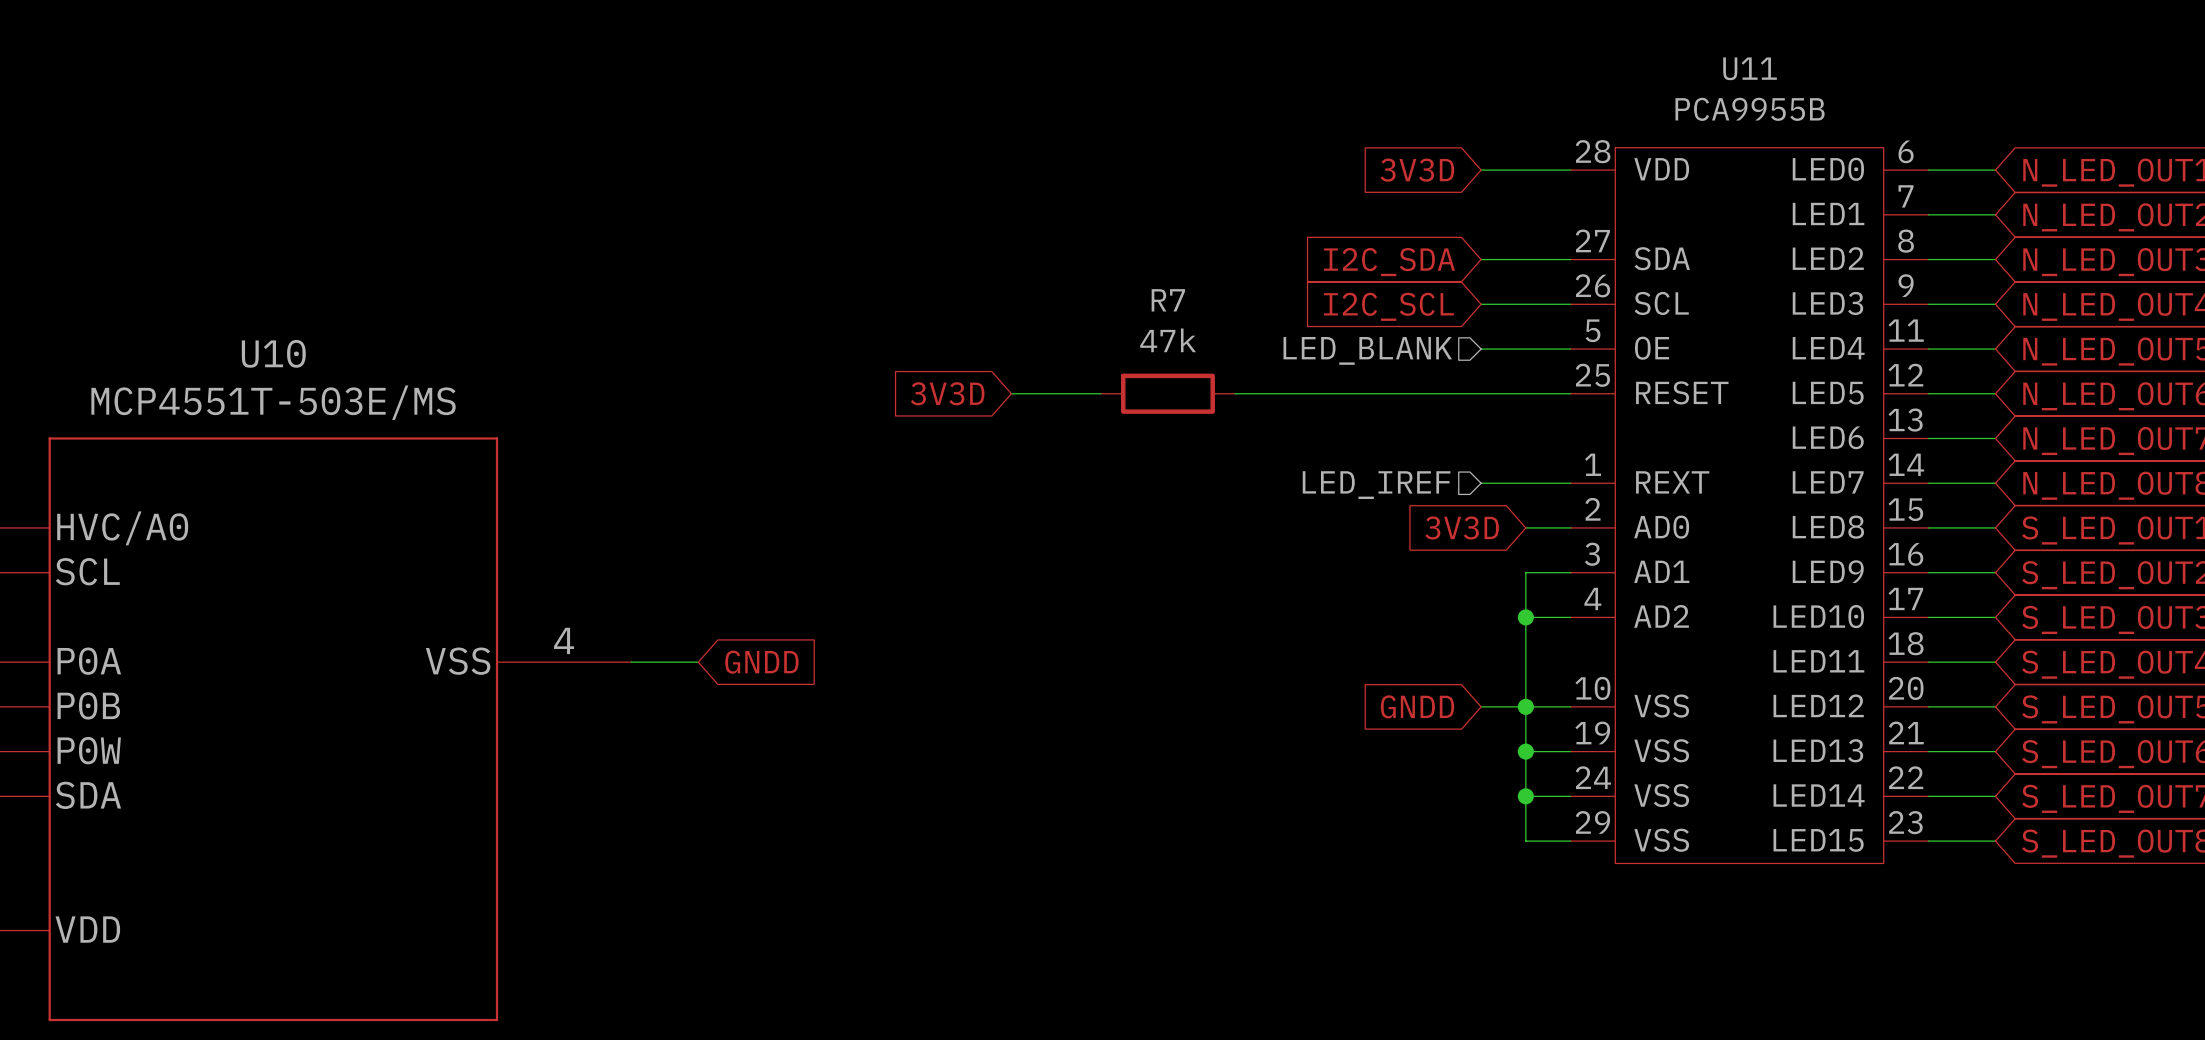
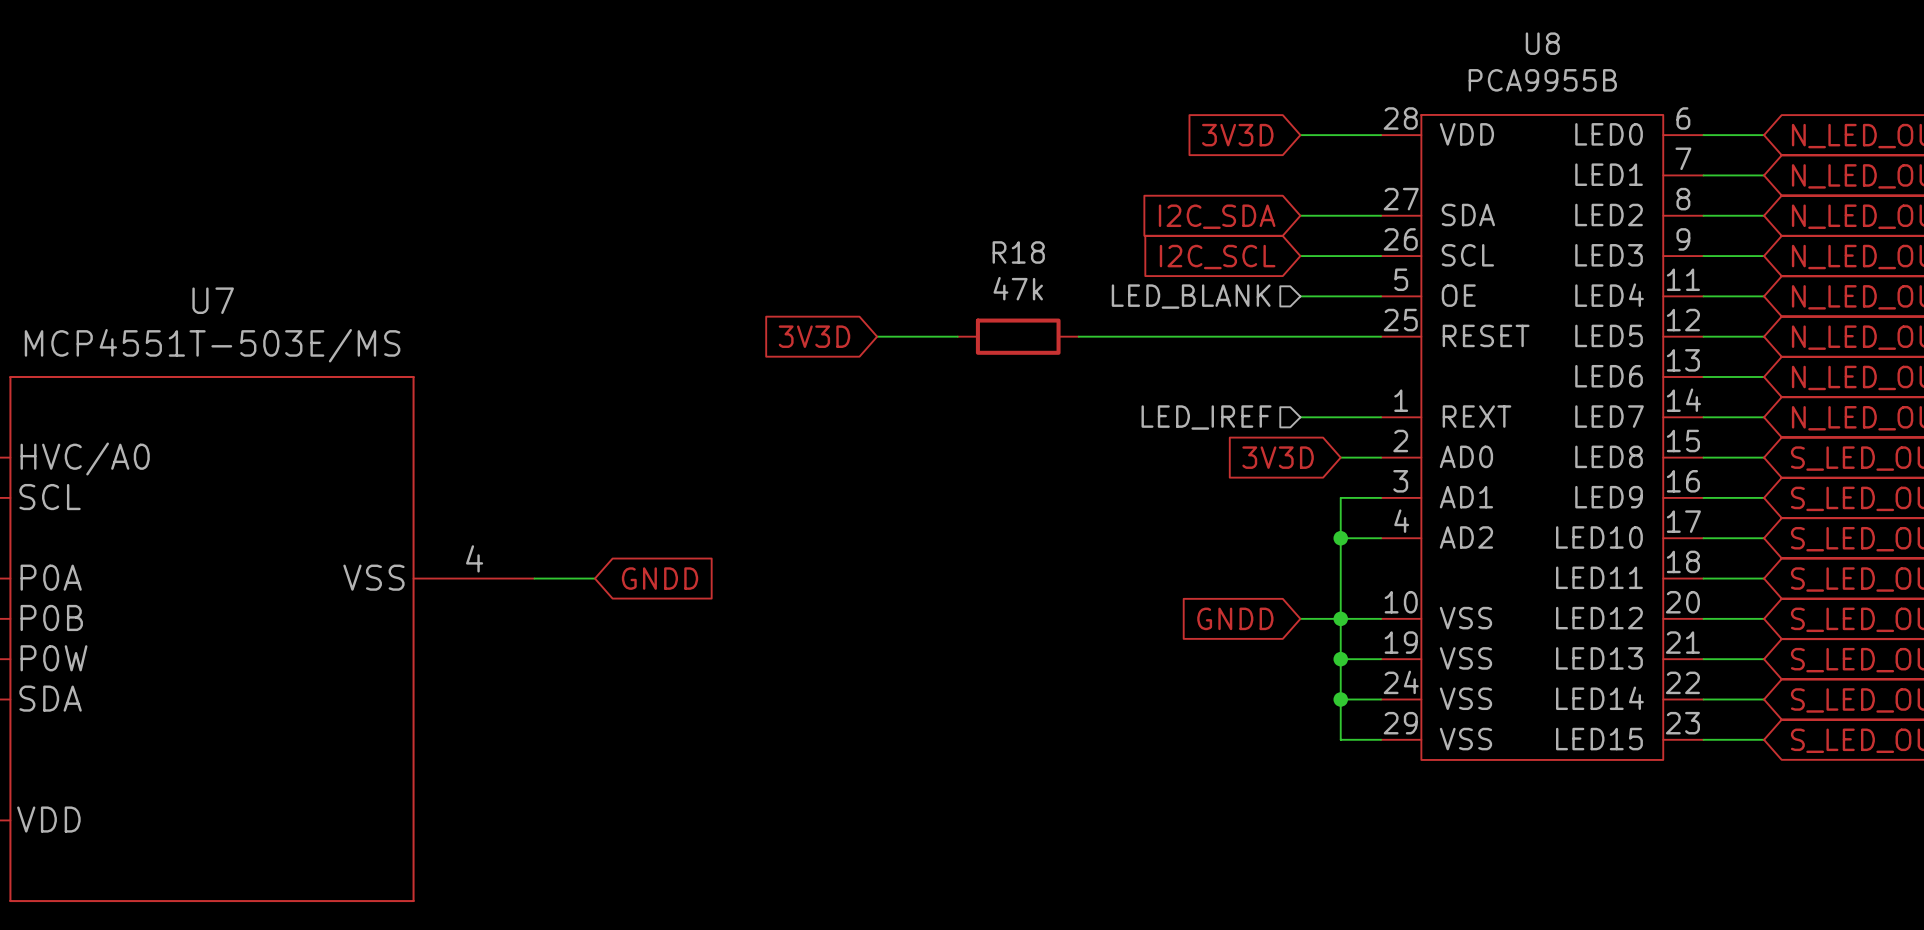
U11 name: U11 (1750, 68) -> U8 (1542, 43)
R7 name: R7 (1168, 300) -> R18 (1018, 252)
U10 name: U10 (273, 353) -> U7 (213, 300)

